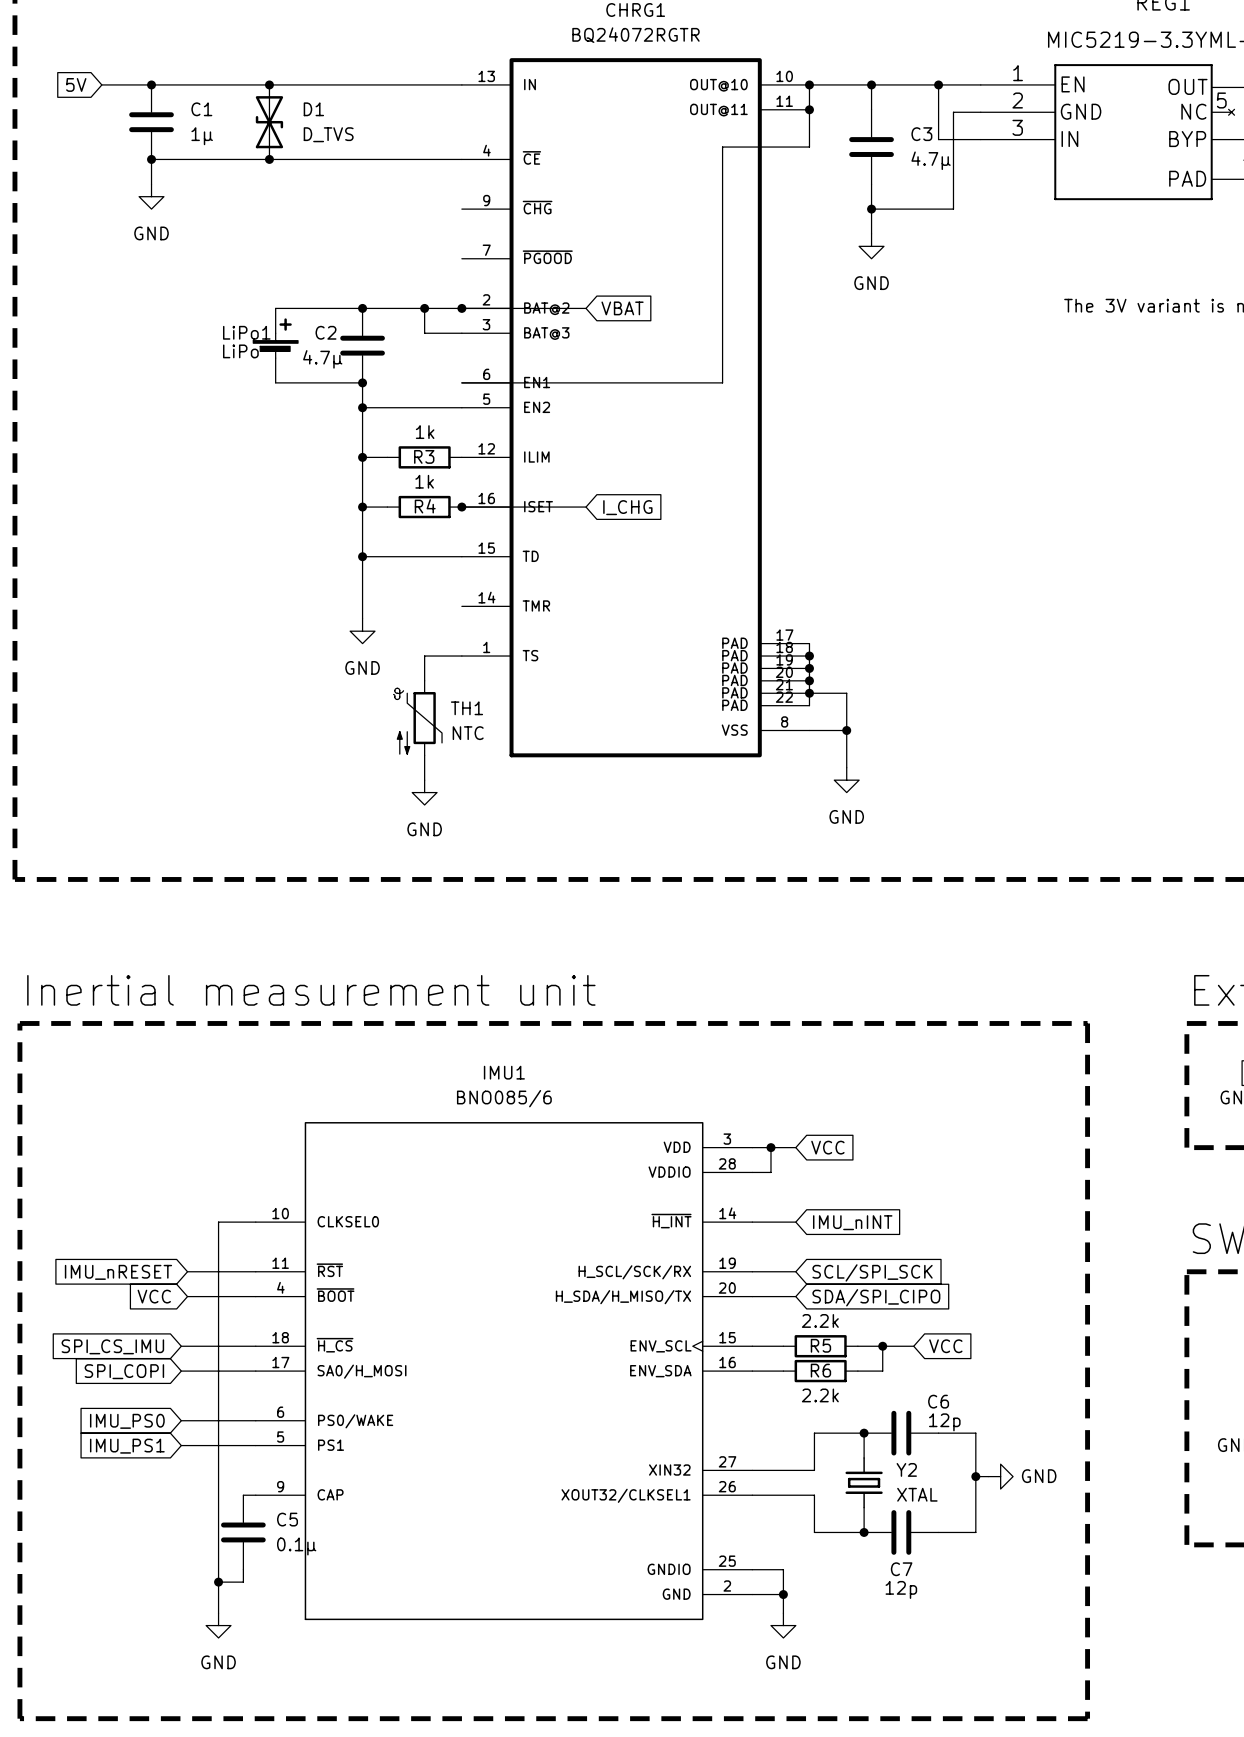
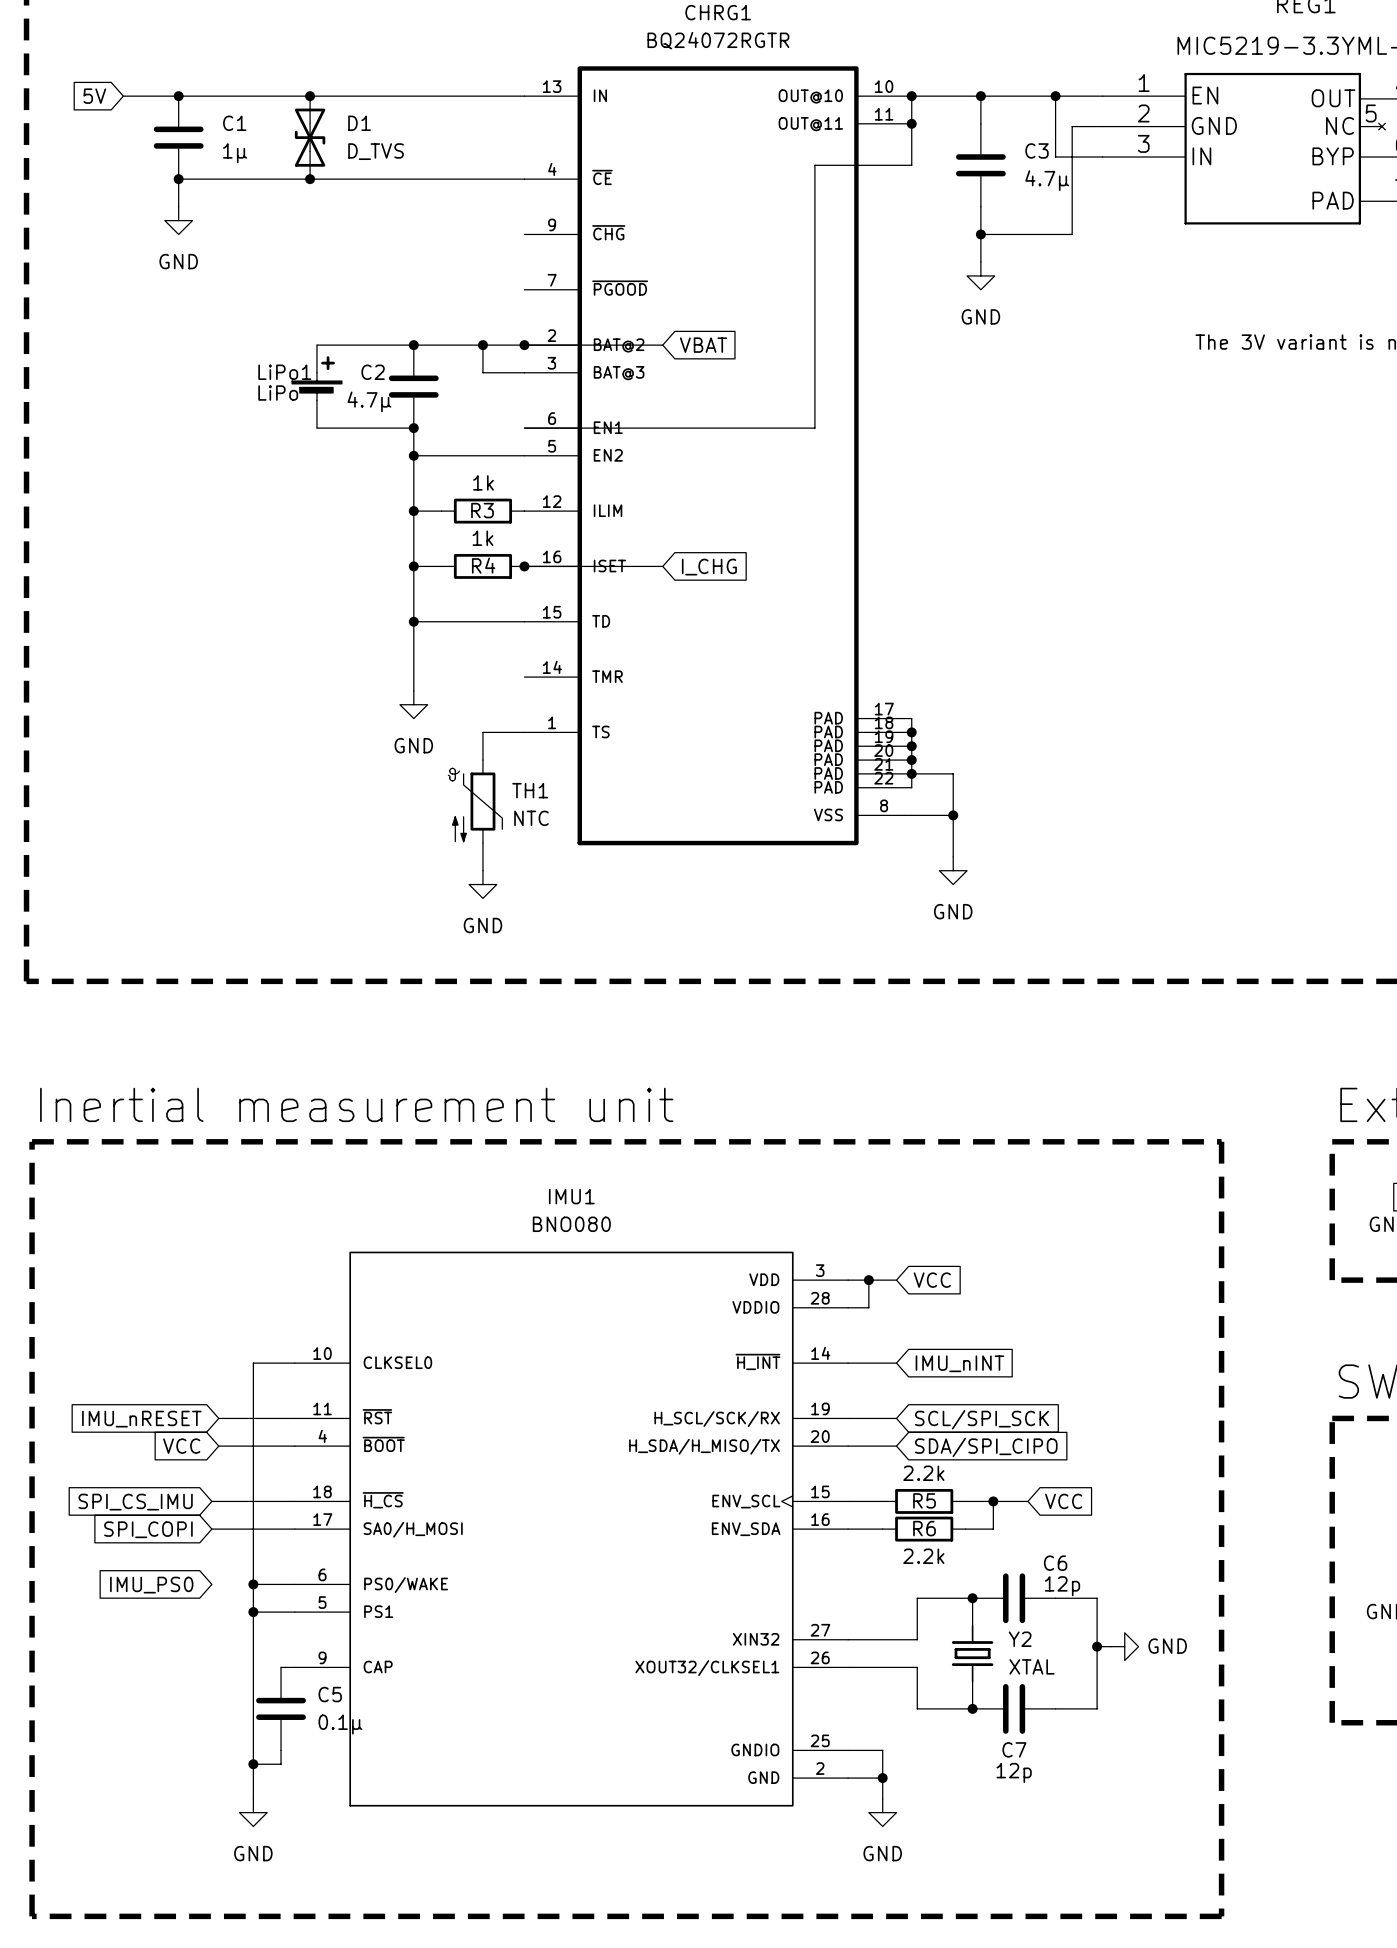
IMU1 value: BNO085/6 (504, 1098) -> BNO080 (571, 1224)
wire: (181, 1420) (218, 1420) -> none
junction: none -> (253, 1584)
wire: (181, 1445) (218, 1445) -> none
junction: none -> (253, 1612)
global label: IMU_PS1 (127, 1446) -> none

